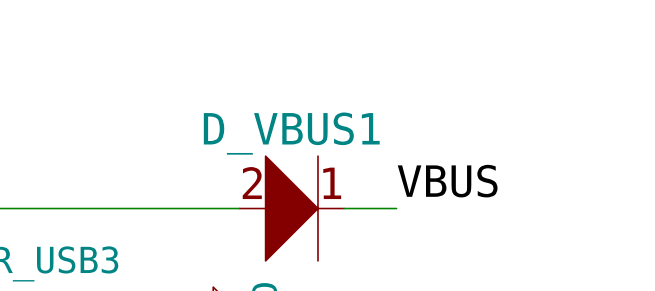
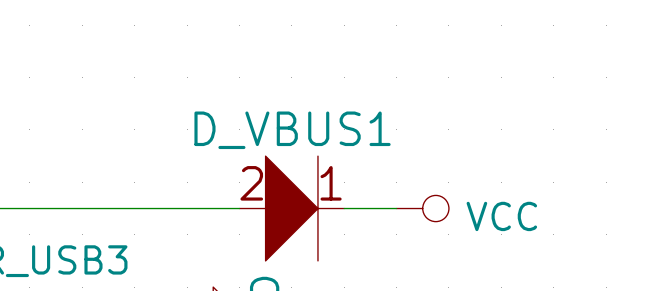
label: VBUS (447, 181) -> none
power symbol: none -> VCC (422, 208)

